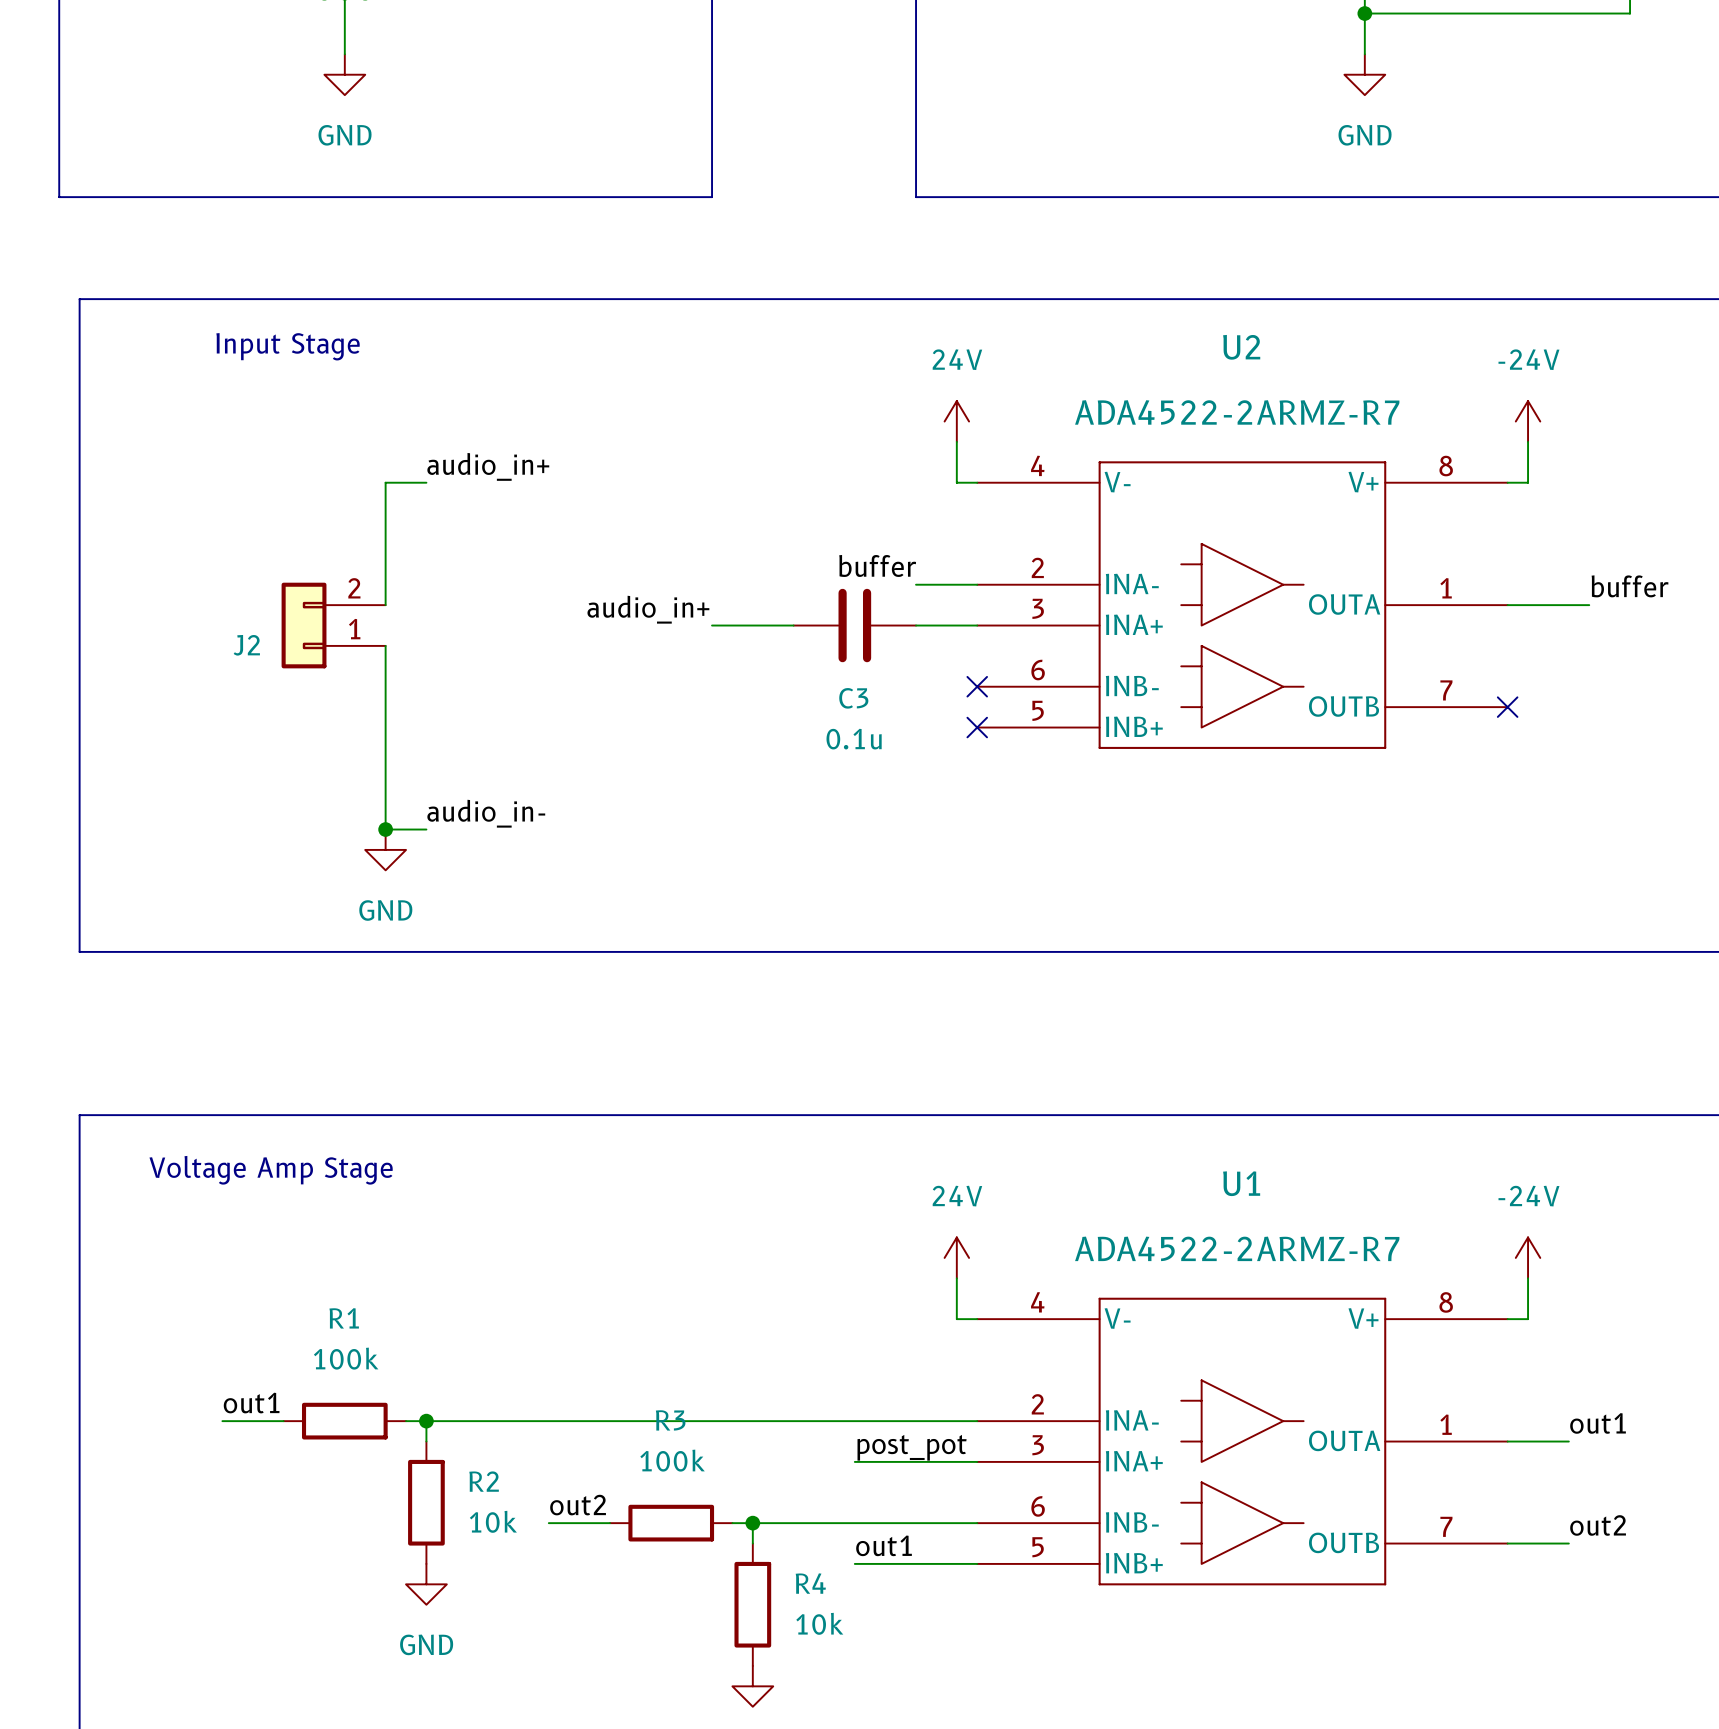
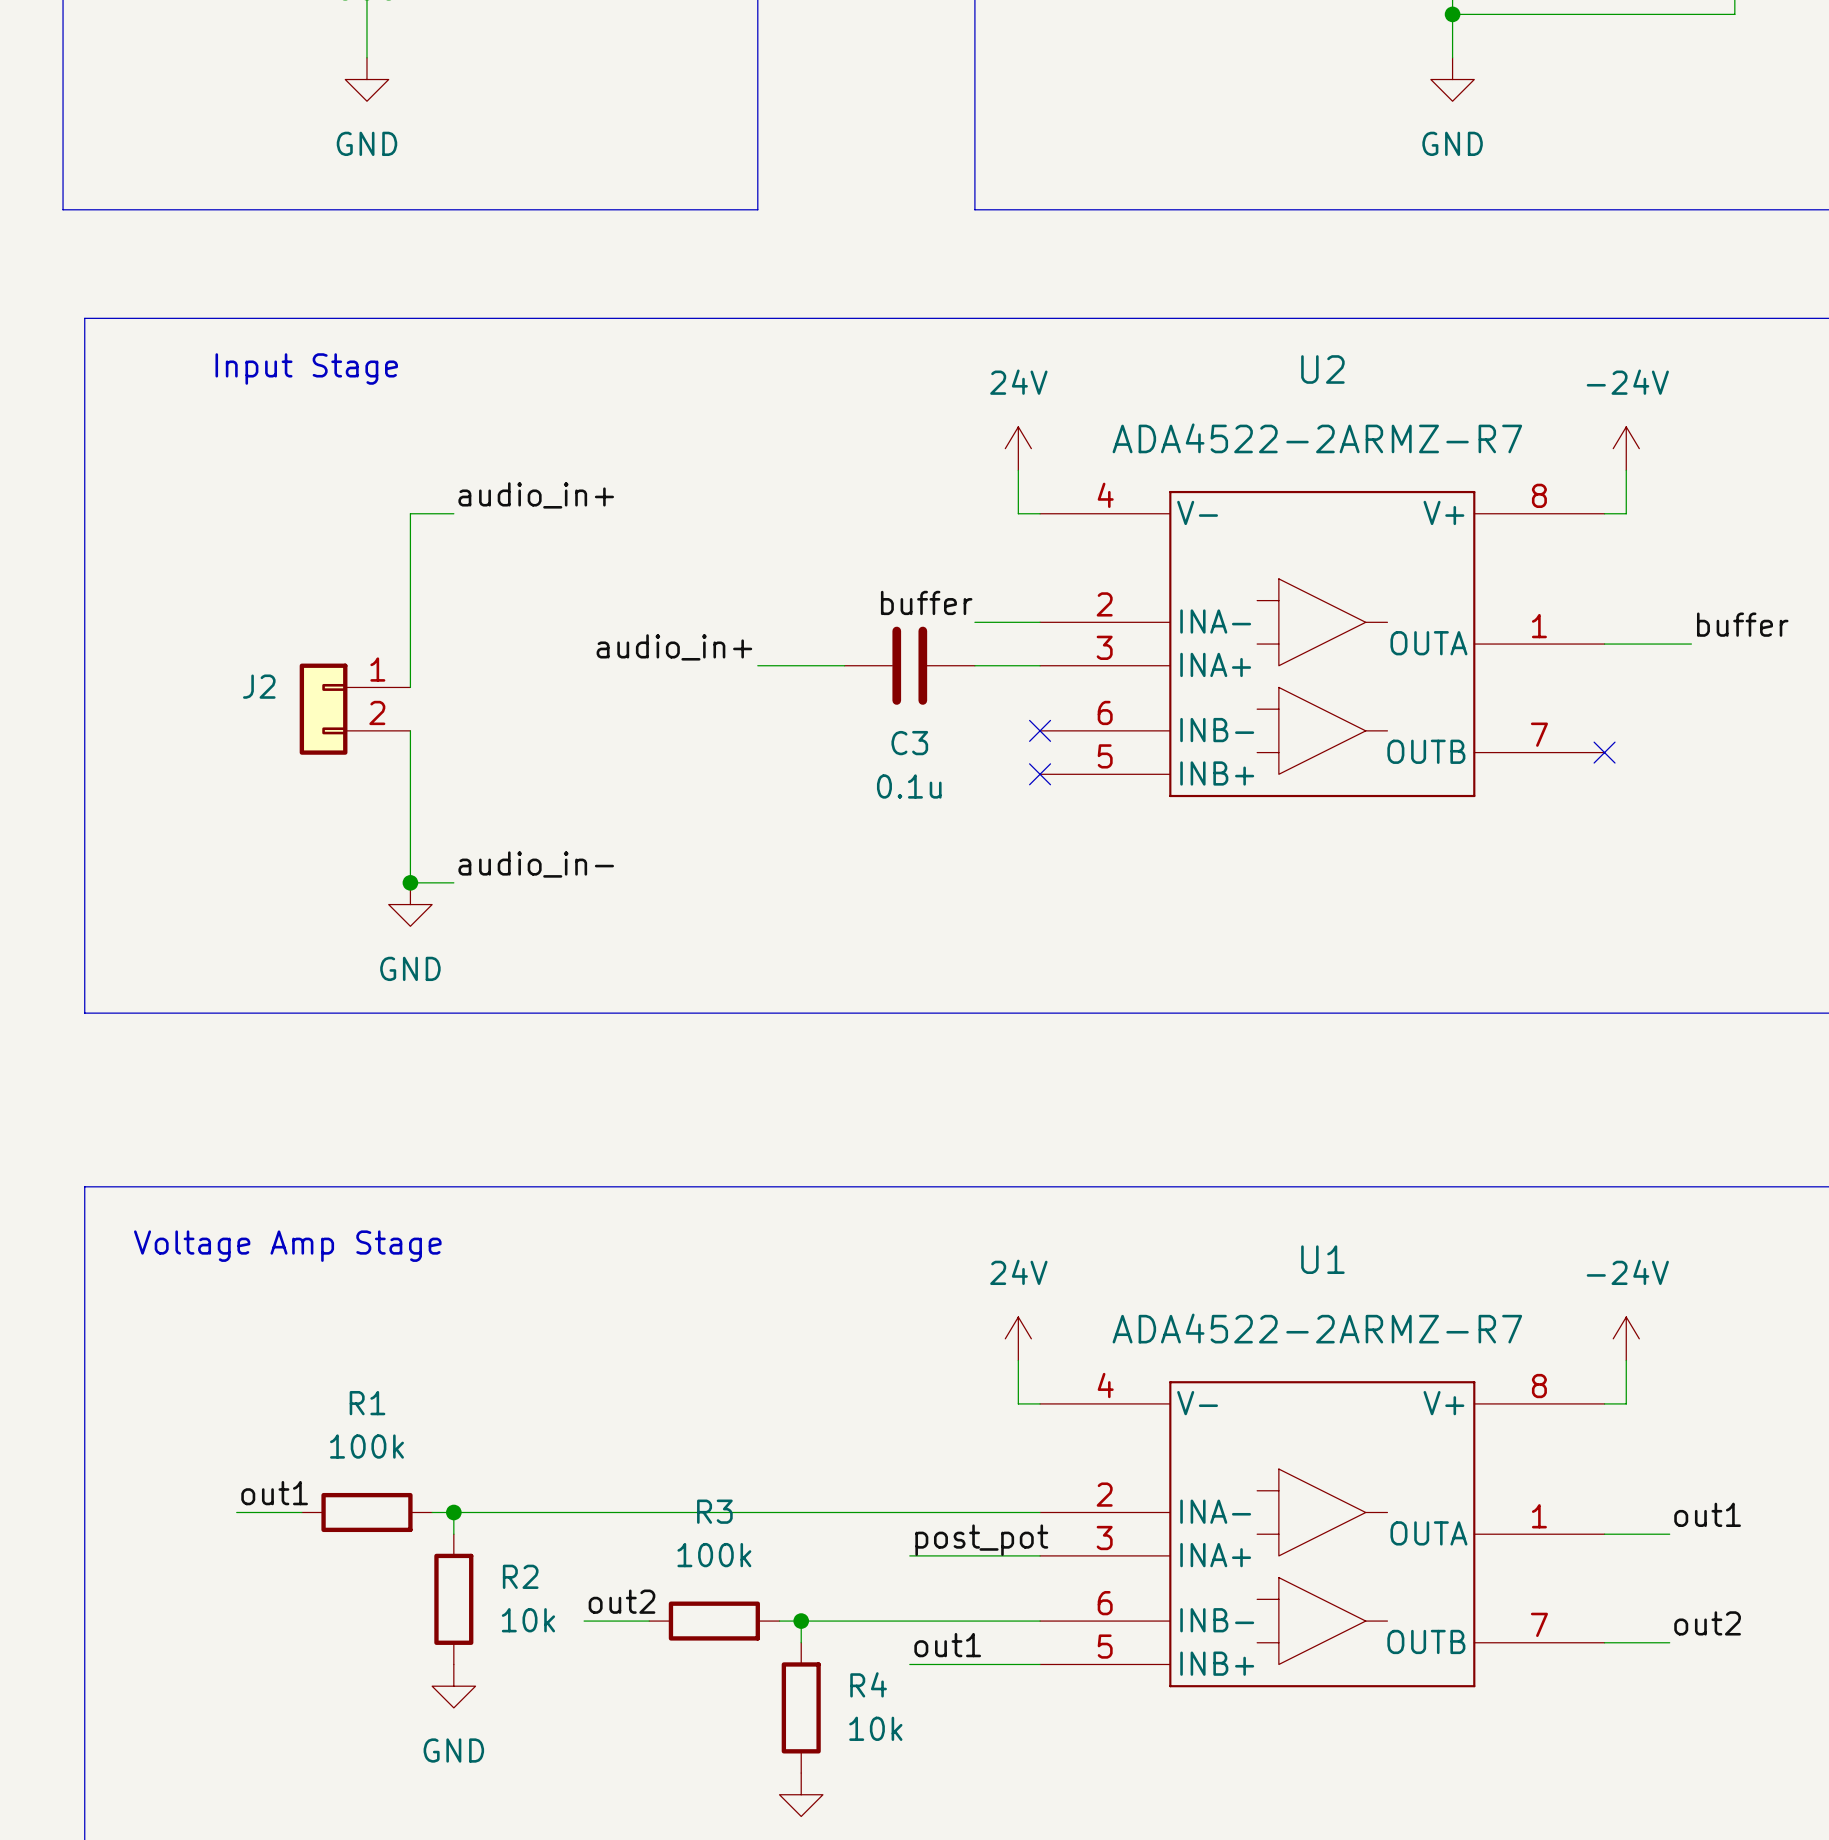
J2 flip: as is (304, 625) -> up-down (323, 709)
wire: (385, 645) (385, 686) -> (410, 687) (410, 644)

